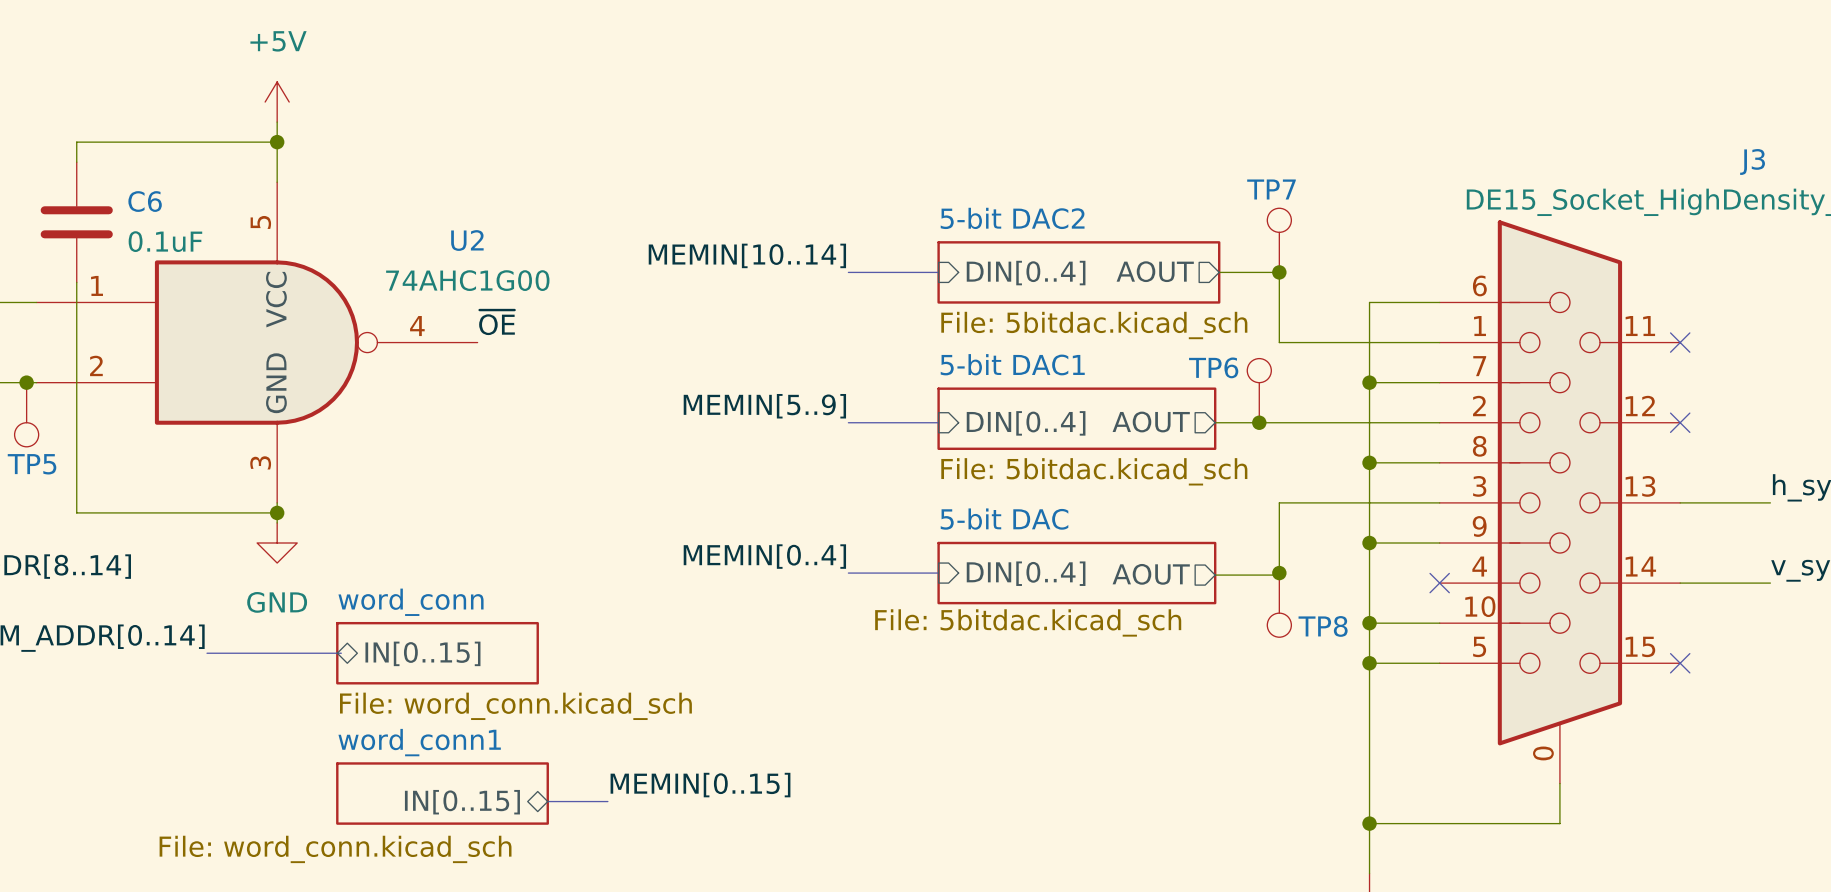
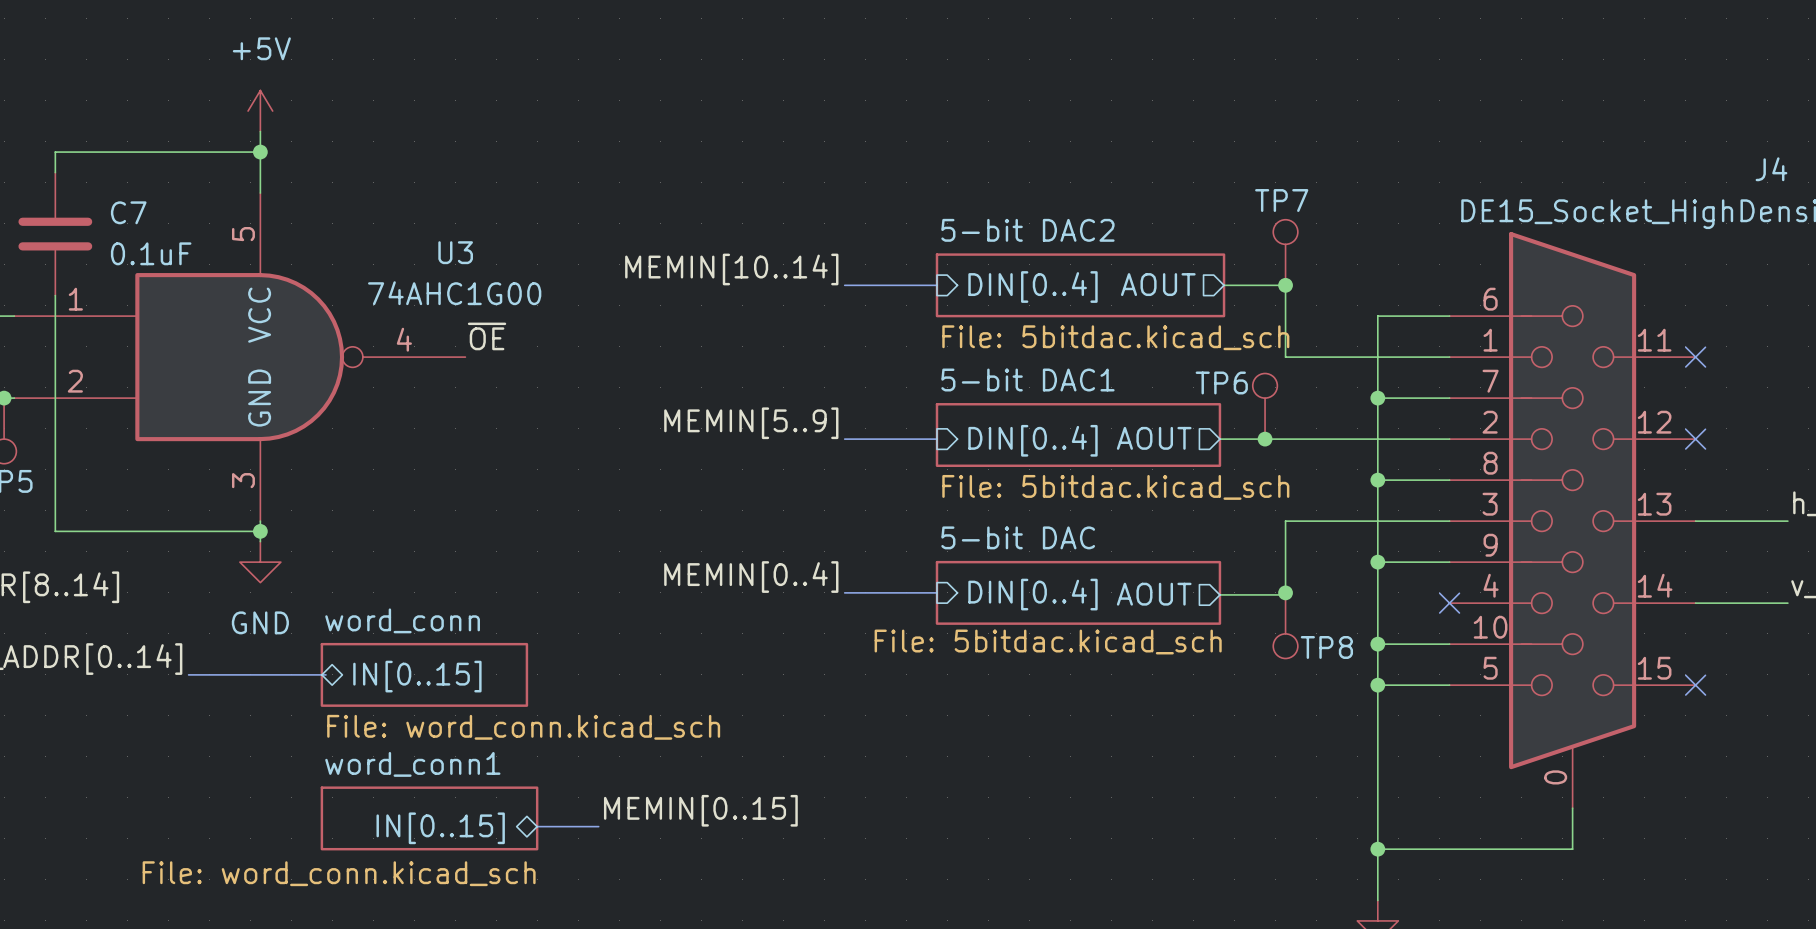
J3 name: J3 (1752, 161) -> J4 (1771, 169)
C6 name: C6 (145, 201) -> C7 (128, 212)
U2 name: U2 (467, 240) -> U3 (455, 252)

